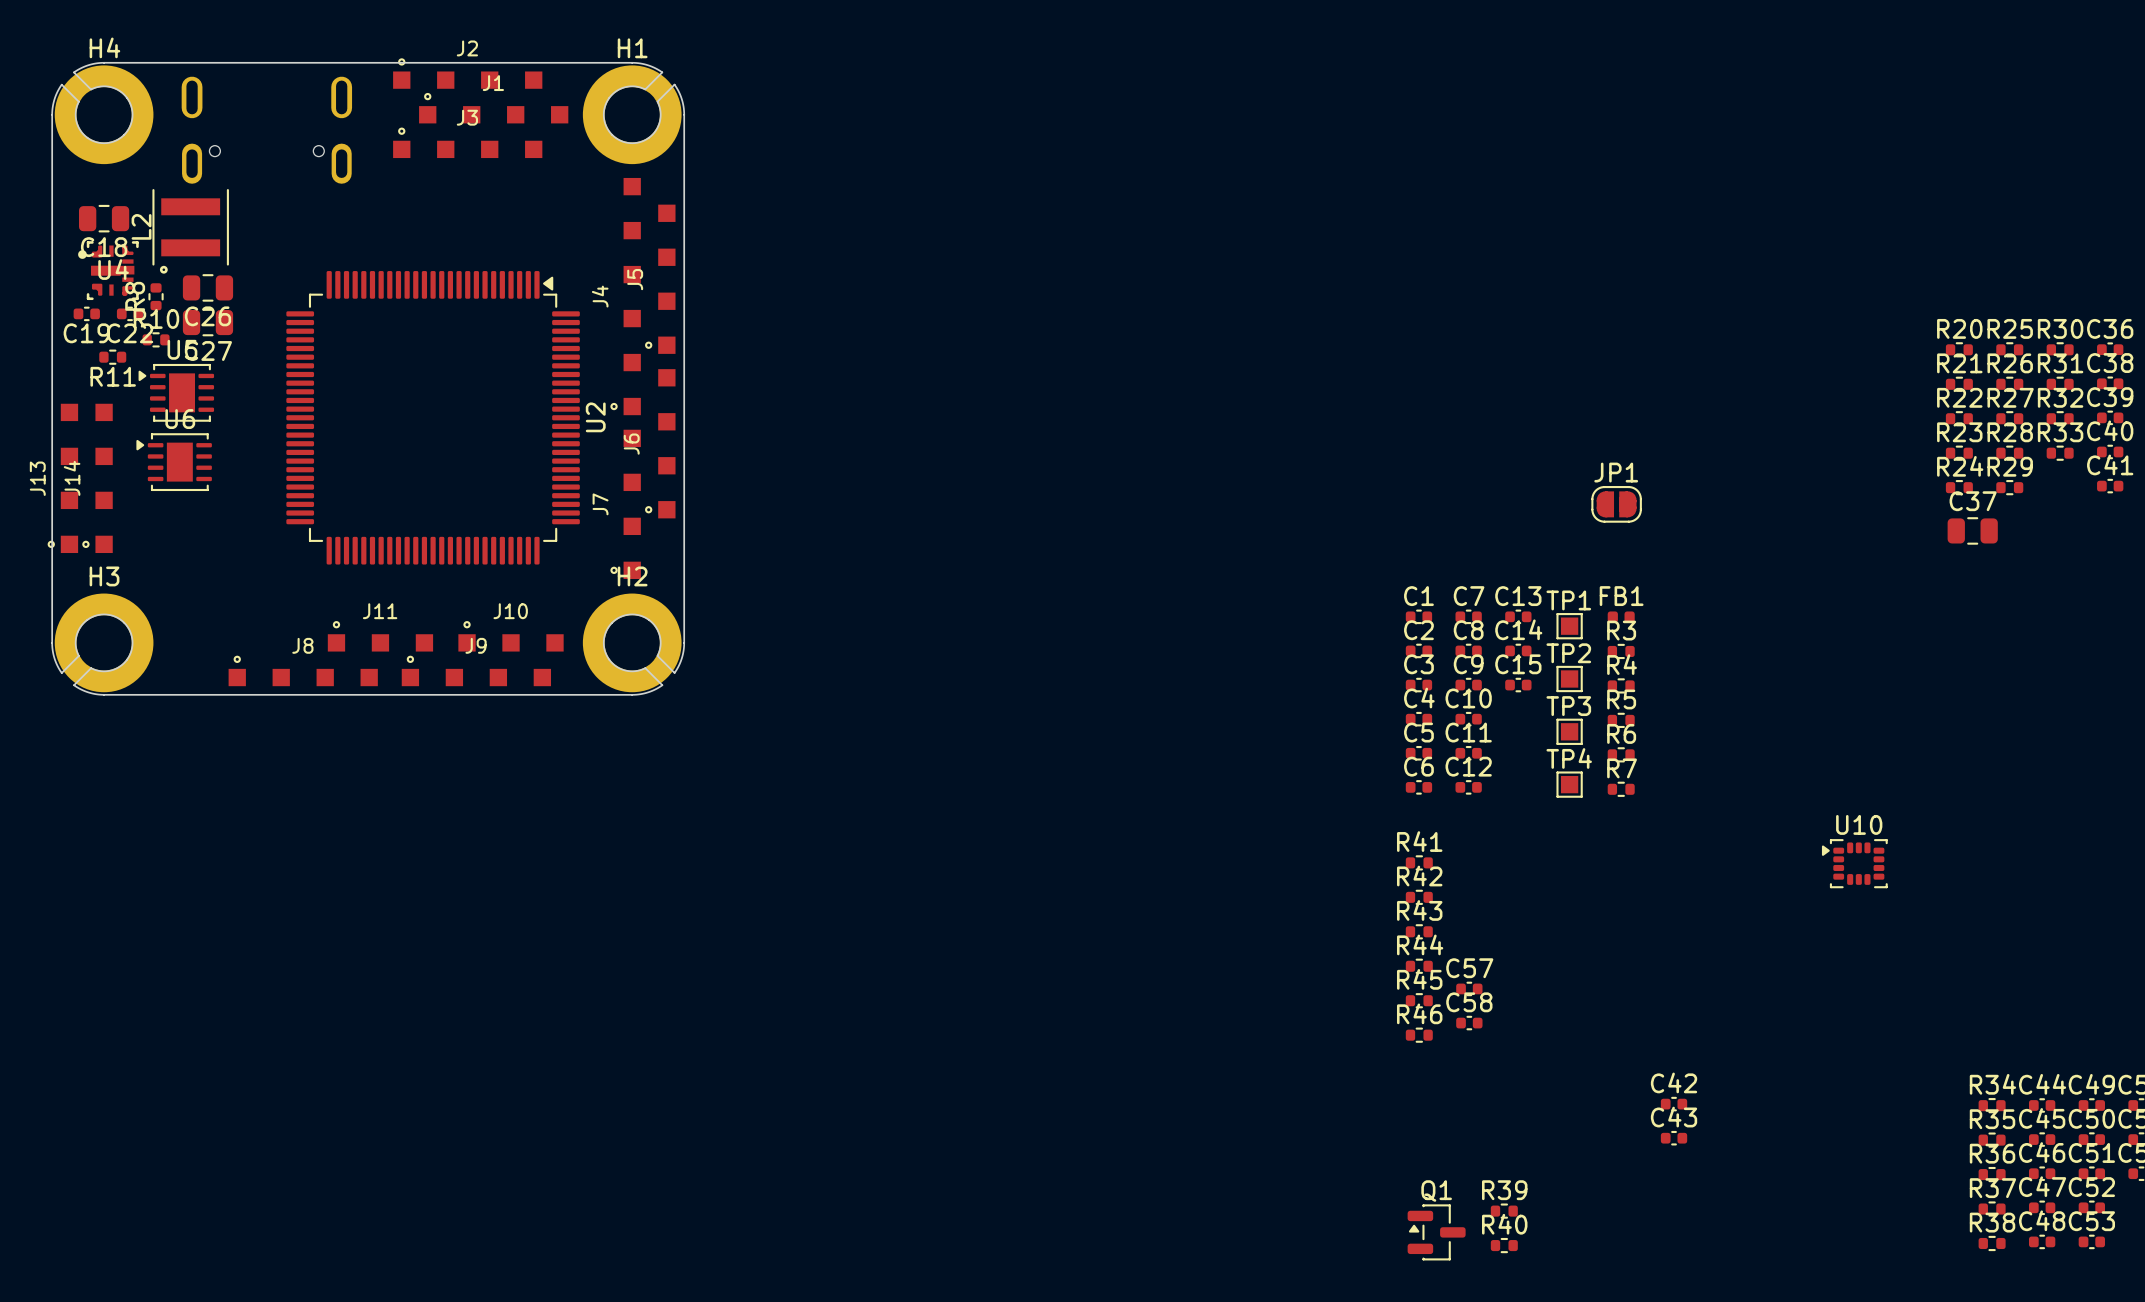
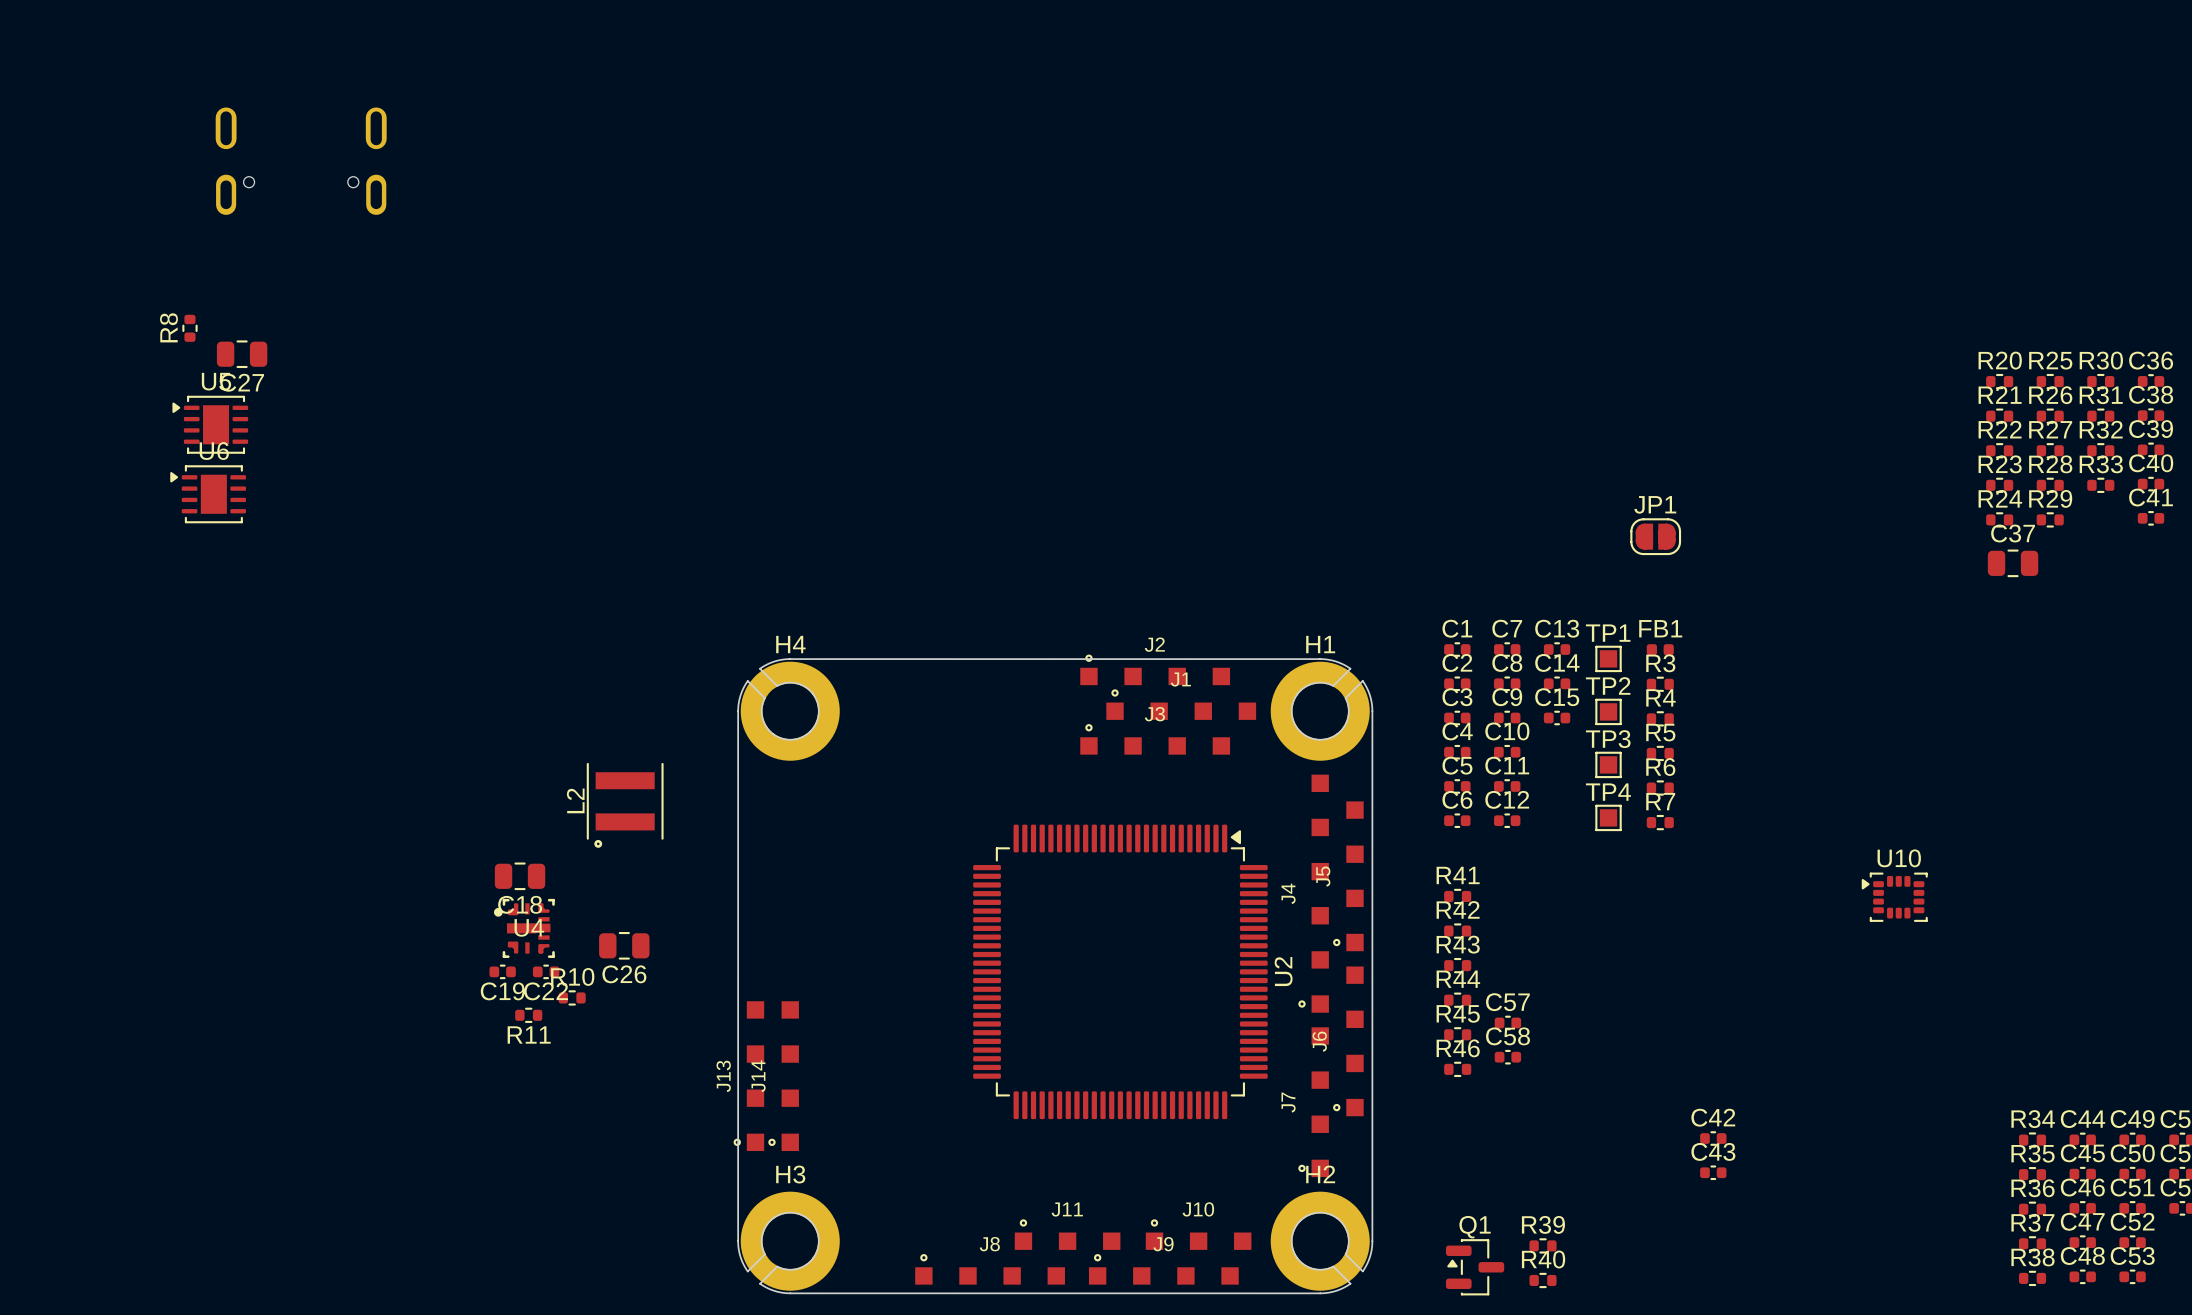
J2 position: (467, 73) -> (1155, 669)
J1 position: (493, 108) -> (1181, 704)
H4 position: (104, 114) -> (790, 711)
H1 position: (632, 114) -> (1320, 711)
J3 position: (467, 142) -> (1155, 739)
C18 position: (104, 218) -> (520, 876)
L2 position: (190, 231) -> (625, 805)
U4 position: (108, 270) -> (524, 928)
J5 position: (660, 279) -> (1348, 876)
C26 position: (207, 287) -> (624, 945)
J4 position: (625, 296) -> (1313, 893)
C19 position: (86, 313) -> (502, 971)
C22 position: (130, 313) -> (546, 971)
R10 position: (156, 339) -> (572, 997)
R11 position: (112, 357) -> (528, 1015)
U2 position: (433, 417) -> (1120, 971)
J6 position: (660, 443) -> (1348, 1041)
J13 position: (62, 478) -> (748, 1076)
J14 position: (97, 478) -> (783, 1076)
J7 position: (625, 504) -> (1313, 1102)
J11 position: (380, 636) -> (1067, 1234)
J10 position: (511, 636) -> (1198, 1234)
H3 position: (104, 642) -> (790, 1241)
H2 position: (632, 642) -> (1320, 1241)
J8 position: (303, 670) -> (990, 1269)
J9 position: (476, 670) -> (1163, 1269)
board edge: (662, 685) (645, 668) (630, 671) (616, 666) (607, 657) (603, 643) (606, 631) (612, 622) (622, 616) (634, 614) (646, 618) (656, 627) (660, 641) (657, 655) (674, 672) (680, 662) (683, 648) (684, 114) (681, 98) (674, 84) (657, 101) (660, 116) (656, 130) (646, 139) (632, 143) (620, 140) (612, 134) (605, 124) (603, 112) (607, 100) (616, 90) (630, 86) (645, 89) (662, 72) (651, 66) (638, 63) (104, 62) (88, 65) (73, 72) (91, 89) (105, 86) (119, 90) (128, 100) (132, 114) (130, 126) (124, 134) (113, 141) (101, 143) (89, 139) (80, 130) (75, 116) (78, 101) (61, 84) (55, 95) (52, 108) (52, 642) (54, 658) (61, 673) (78, 655) (75, 641) (80, 627) (89, 618) (103, 614) (115, 616) (124, 622) (130, 633) (132, 645) (128, 657) (119, 666) (105, 671) (91, 668) (74, 685) (84, 691) (98, 694) (632, 694) (648, 692) (662, 685) -> none
board edge: none -> (747, 1271) (764, 1254) (761, 1239) (766, 1225) (775, 1216) (789, 1212) (802, 1215) (810, 1220) (817, 1231) (818, 1243) (814, 1255) (805, 1265) (791, 1269) (777, 1266) (760, 1283) (770, 1289) (784, 1292) (1320, 1293) (1336, 1290) (1350, 1283) (1333, 1266) (1318, 1269) (1304, 1265) (1295, 1255) (1291, 1241) (1294, 1229) (1300, 1221) (1310, 1214) (1322, 1212) (1334, 1216) (1344, 1225) (1348, 1239) (1345, 1254) (1362, 1271) (1368, 1260) (1372, 1247) (1372, 711) (1369, 695) (1362, 680) (1345, 698) (1348, 712) (1344, 726) (1334, 735) (1320, 739) (1308, 737) (1300, 731) (1293, 720) (1291, 708) (1295, 696) (1304, 687) (1318, 682) (1333, 685) (1350, 668) (1339, 662) (1326, 659) (790, 659) (774, 661) (760, 668) (777, 685) (791, 682) (805, 687) (814, 696) (818, 710) (816, 723) (810, 731) (799, 738) (787, 739) (775, 735) (766, 726) (761, 712) (764, 698) (747, 681) (741, 691) (738, 705) (738, 1241) (740, 1257) (747, 1271)

